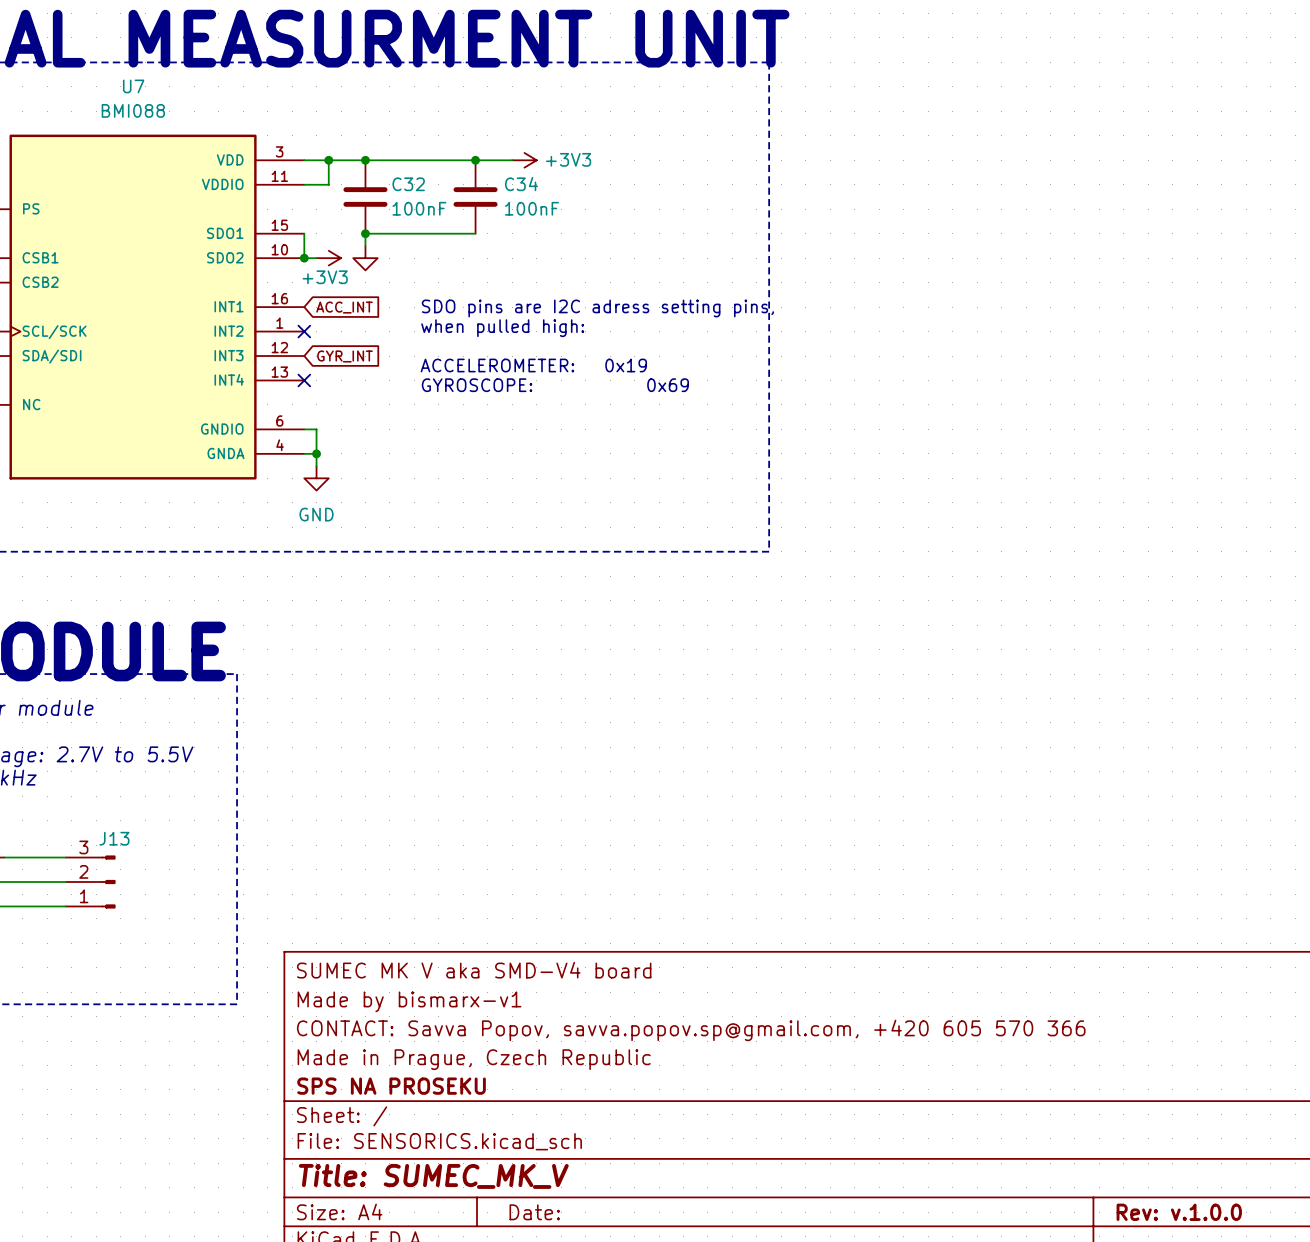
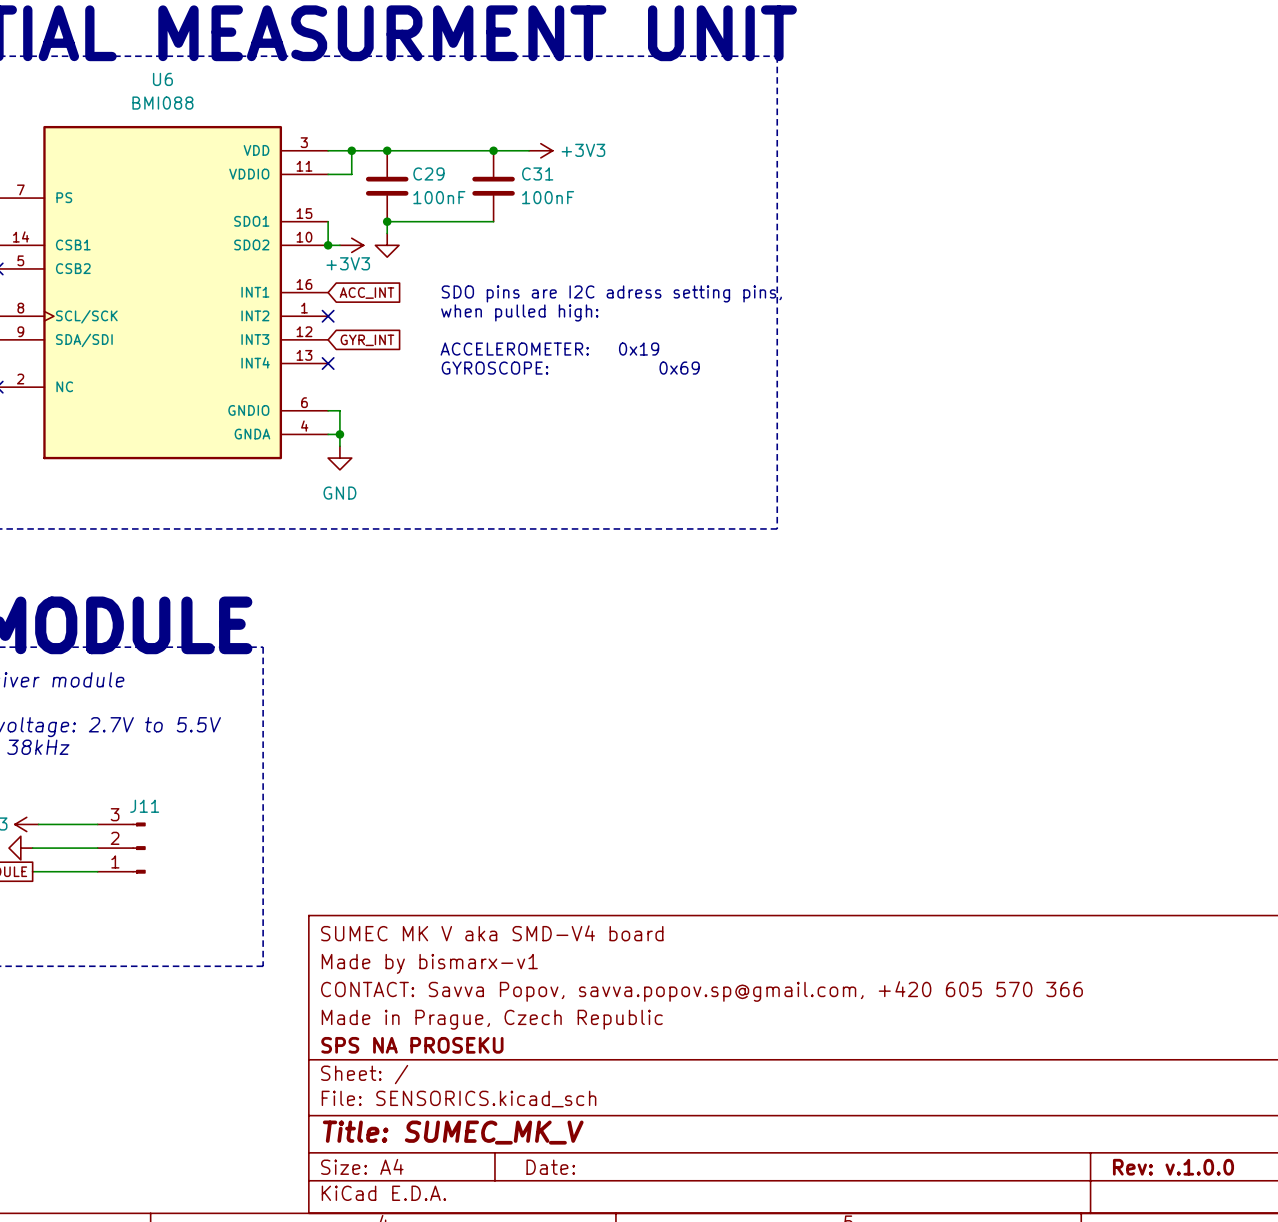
U7 name: U7 (133, 86) -> U6 (162, 79)
C32 name: C32 (408, 184) -> C29 (428, 173)
C34 name: C34 (521, 184) -> C31 (537, 173)
J13 name: J13 (114, 838) -> J11 (144, 806)

